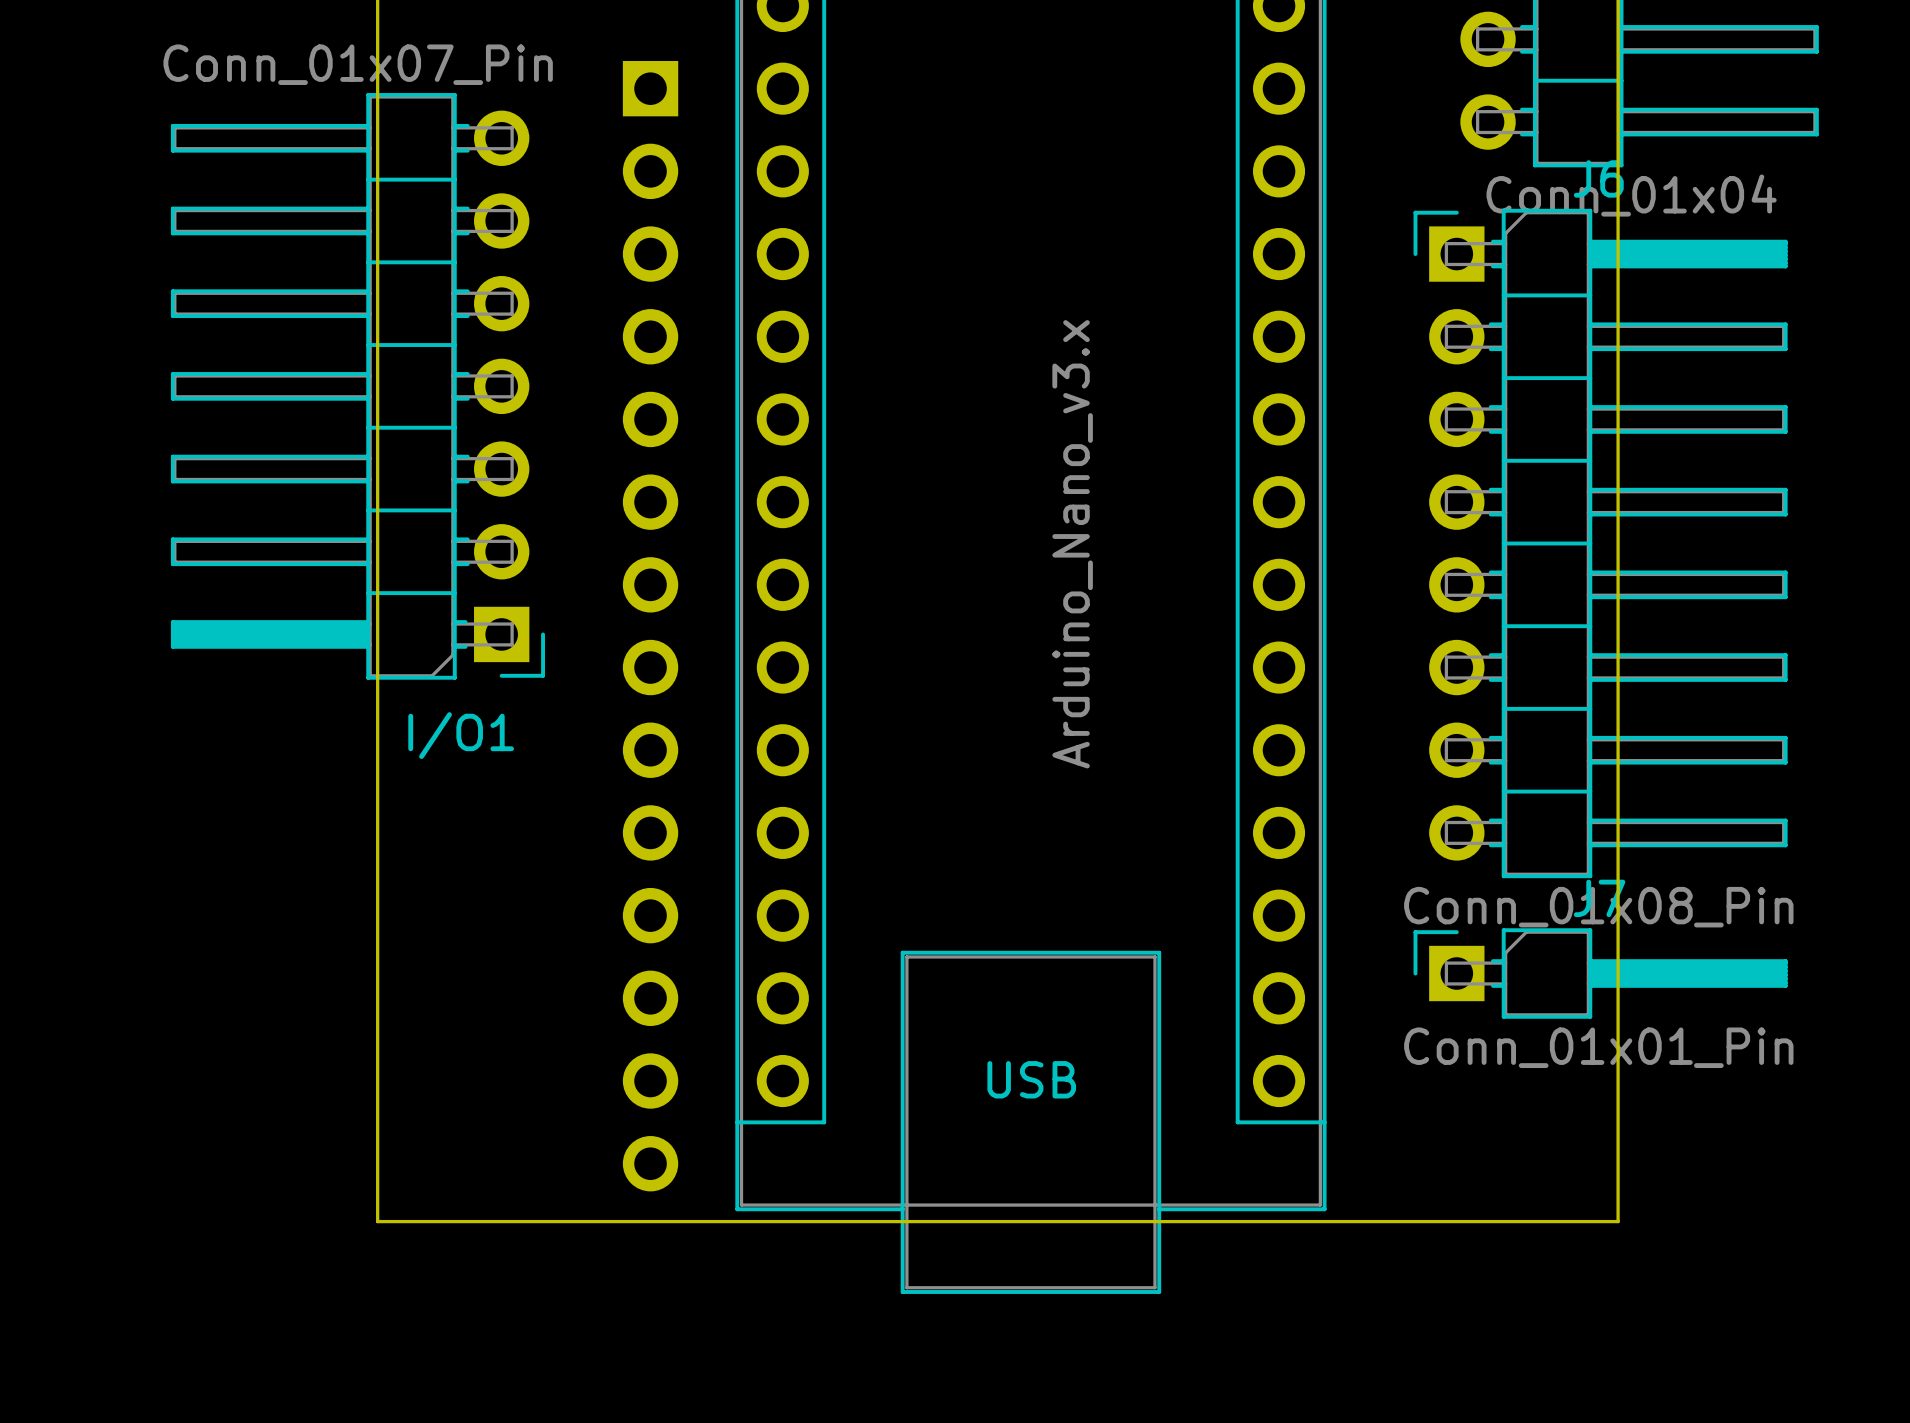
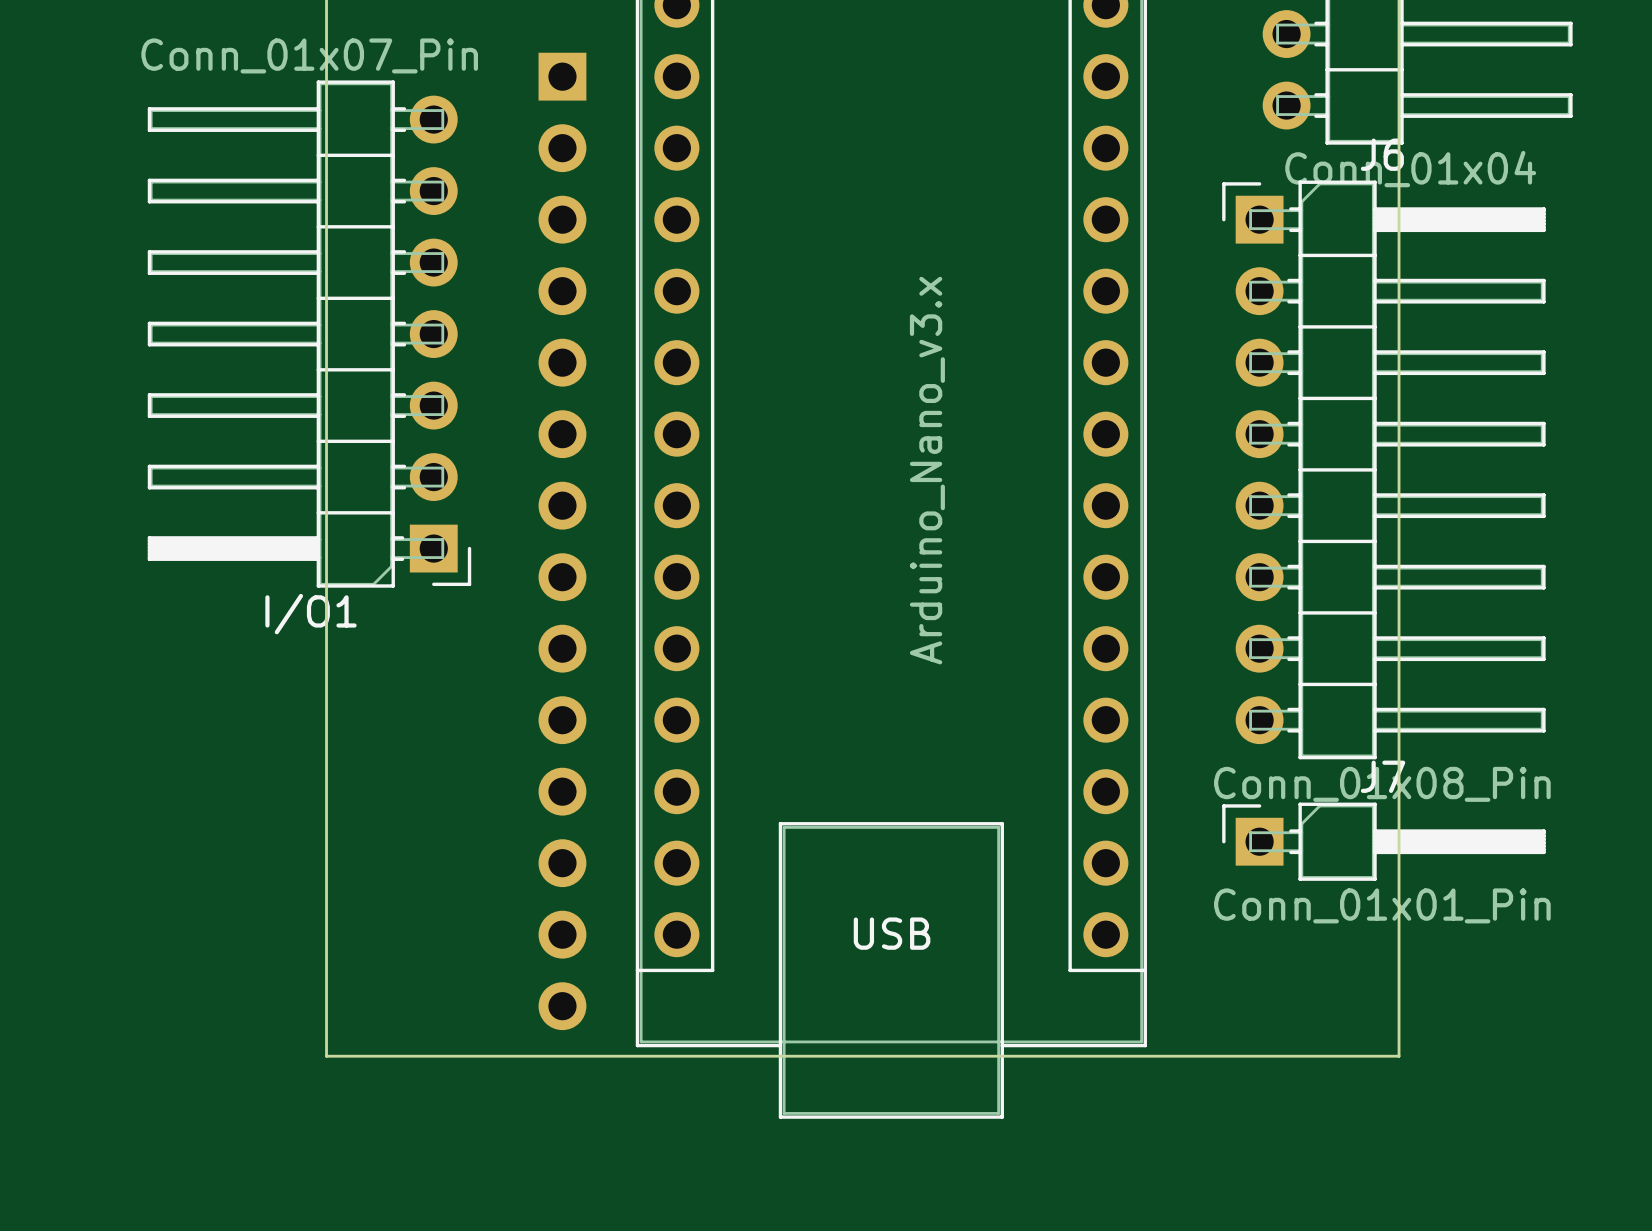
I/O1 name position: I/O1 (461, 735) -> I/O1 (311, 614)

